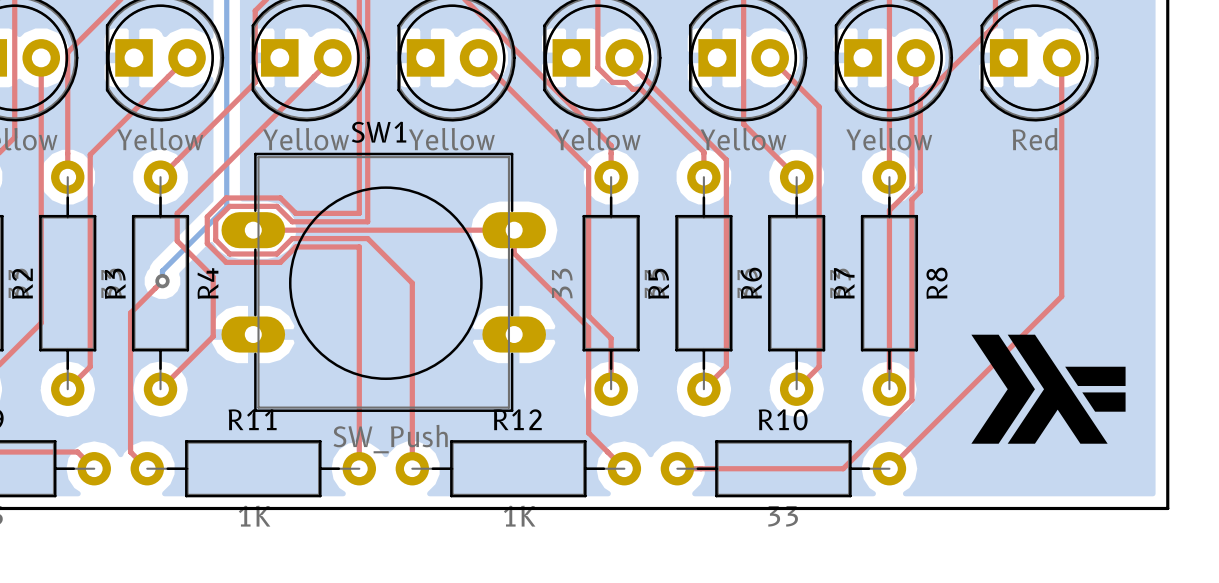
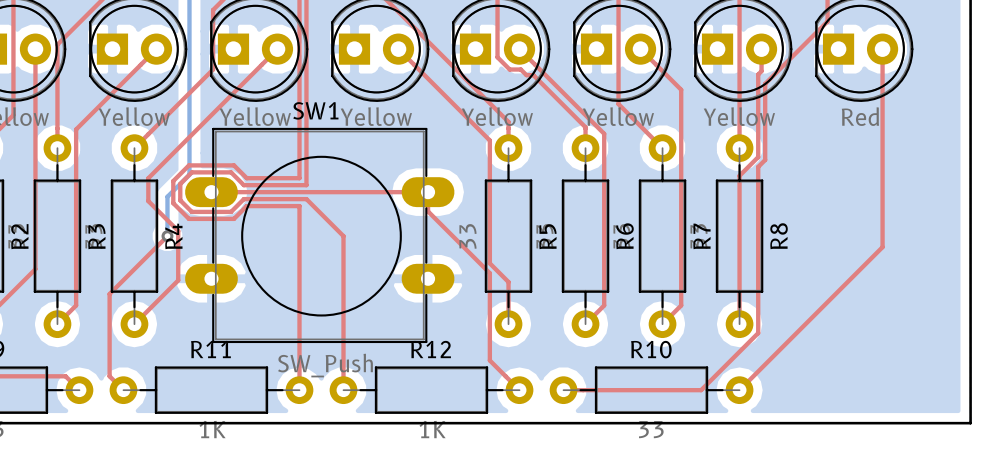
bottom track: (226, 206) (162, 271) (162, 281) -> (189, 172) (167, 196) (167, 236)
top track: (162, 281) (130, 313) (130, 352) -> (167, 236) (109, 294)
via position: (162, 281) -> (167, 236)
drawing: [971, 334, 1126, 444] -> none

